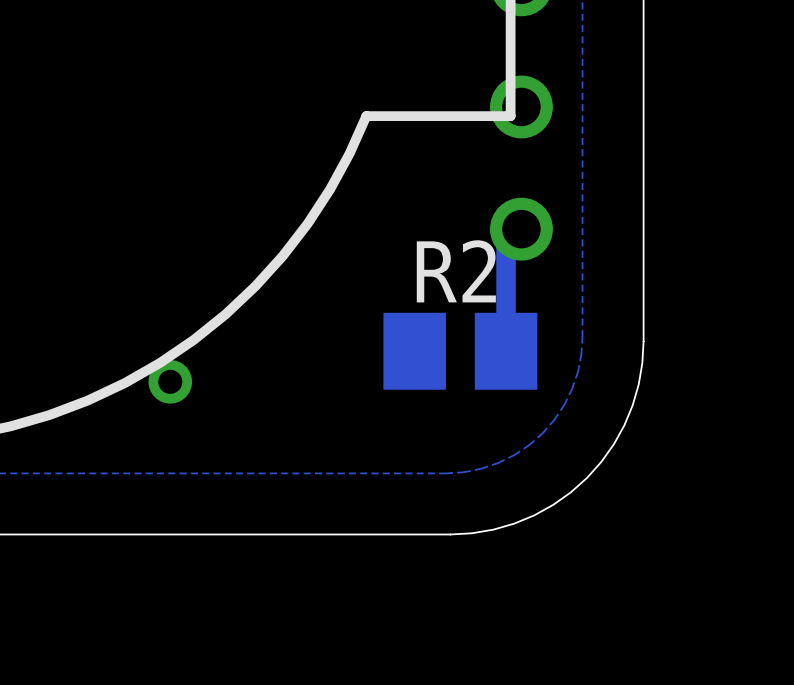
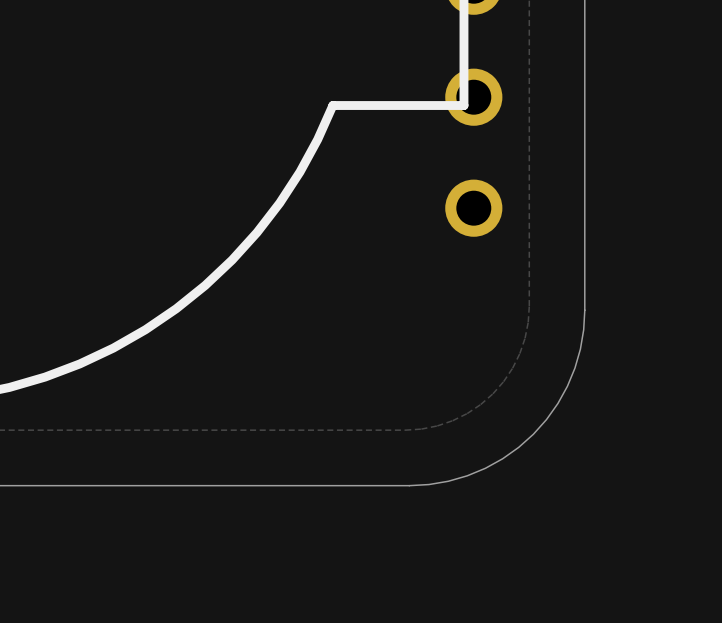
track: (521, 229) (506, 244) (506, 351) -> none
R2: (460, 351) -> none
via: (170, 381) -> none

